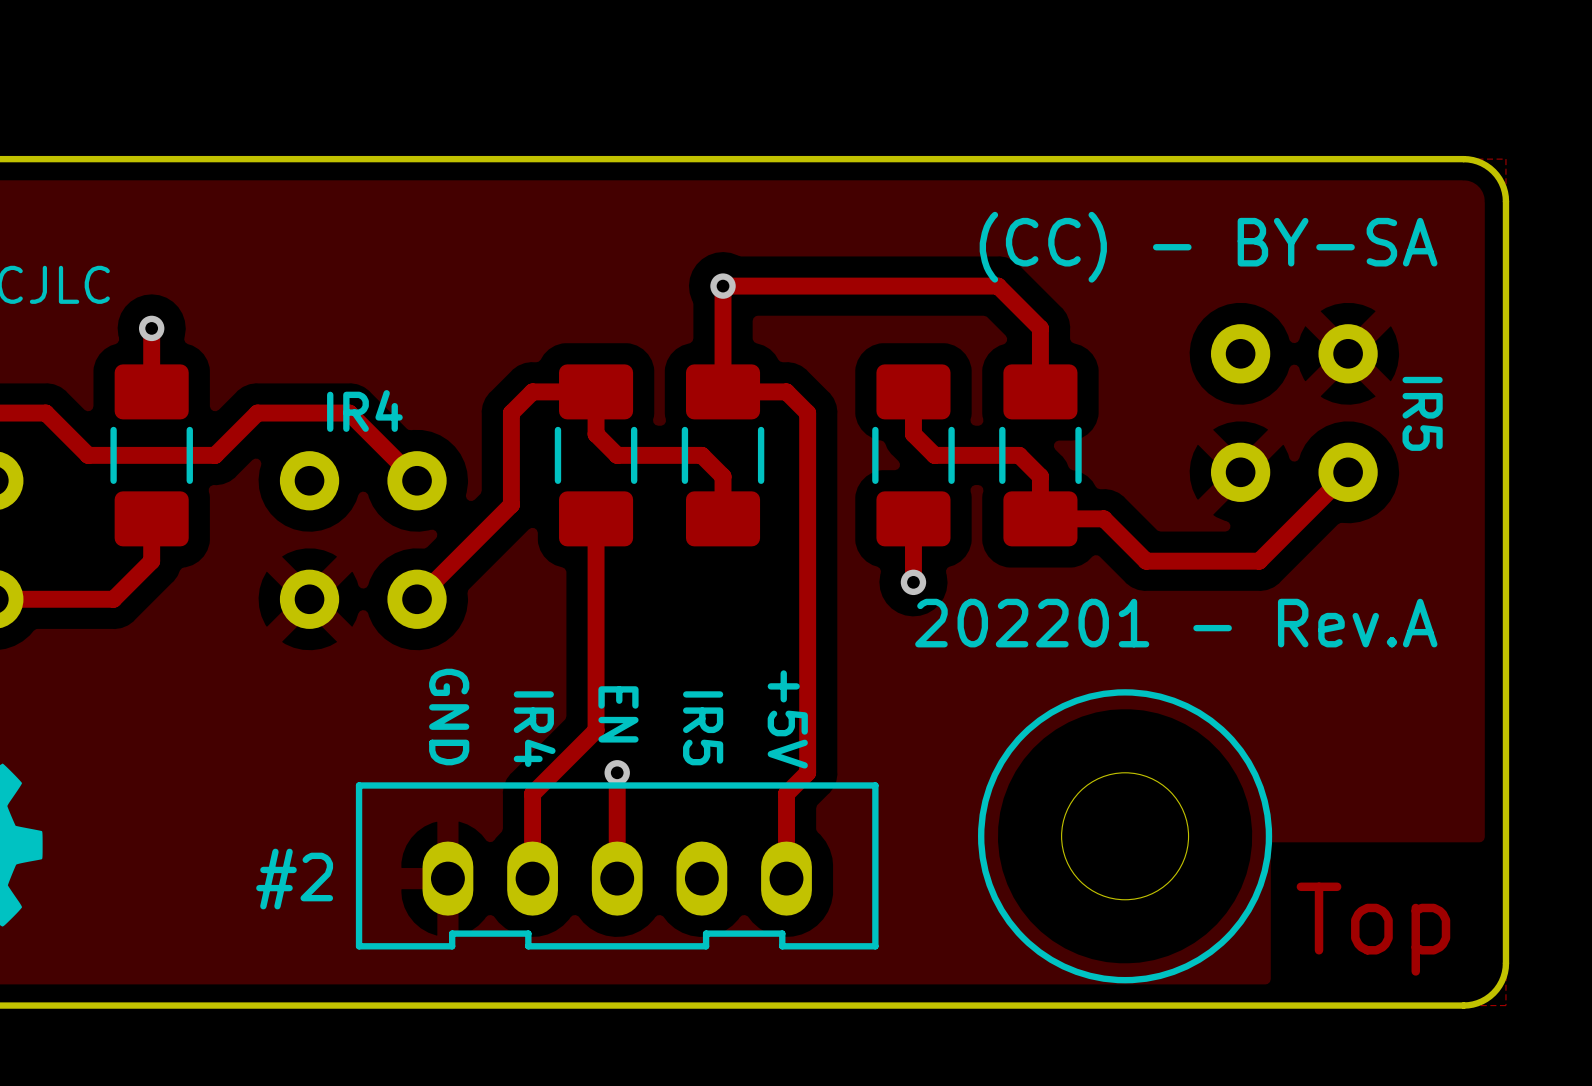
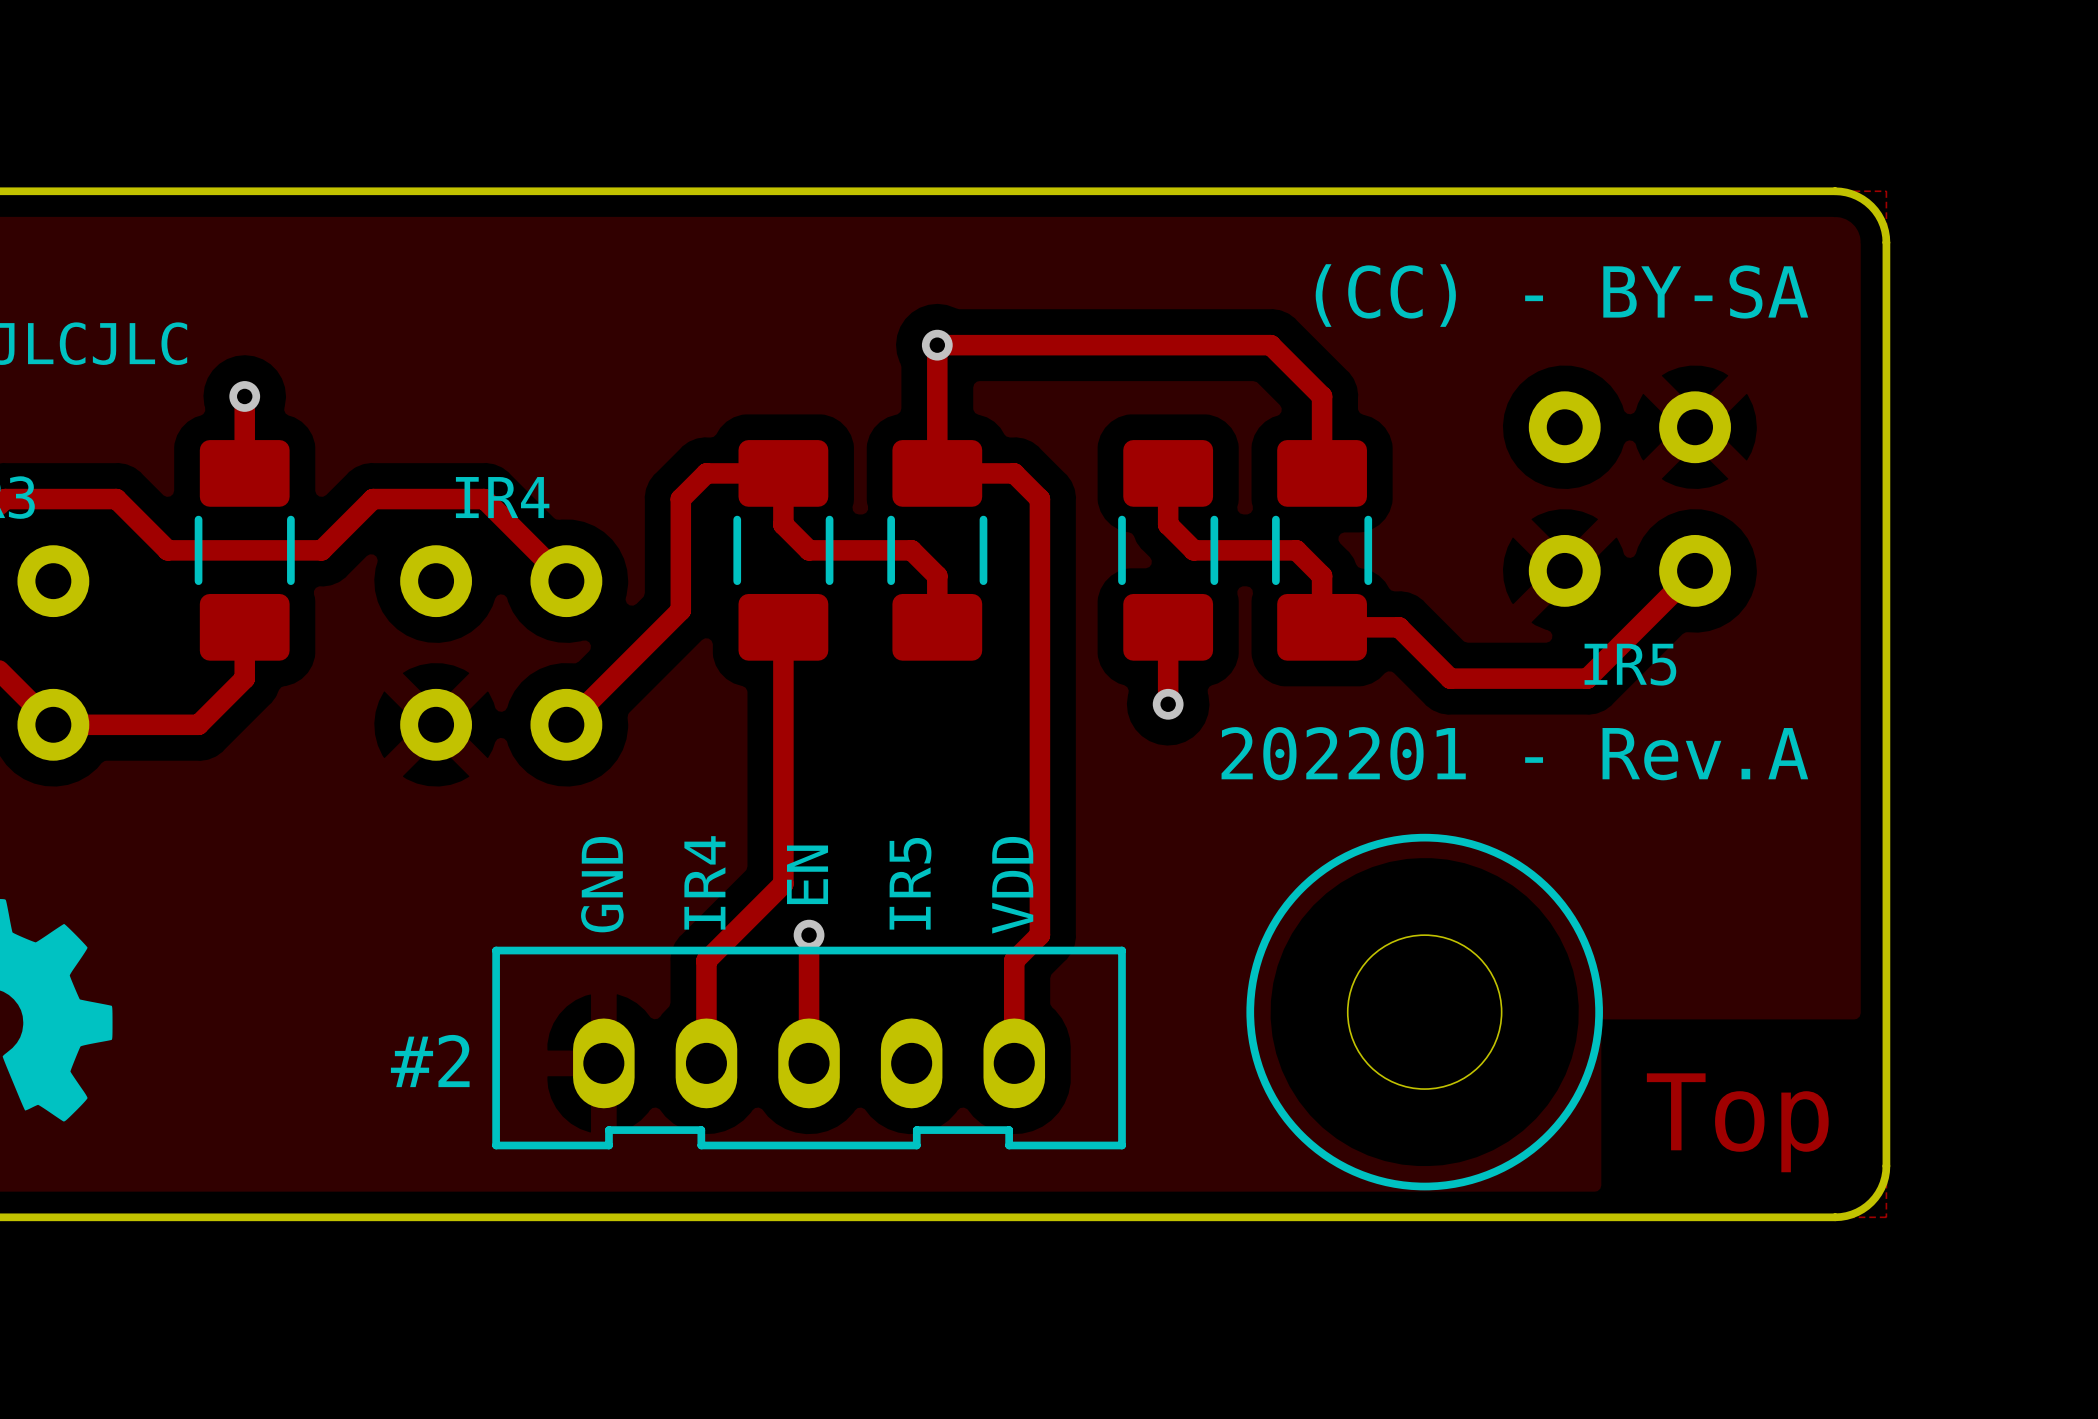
text rotation: 0° (1422, 413) -> 90° counterclockwise (1630, 664)
text position: IR5 (1422, 413) -> IR5 (1630, 664)
text rotation: 0° (618, 714) -> 180° (807, 874)
text rotation: 0° (449, 717) -> 180° (602, 884)
text: +5V (787, 719) -> VDD (1012, 885)
text rotation: 0° (703, 728) -> 180° (910, 883)
text rotation: 0° (534, 729) -> 180° (704, 882)

